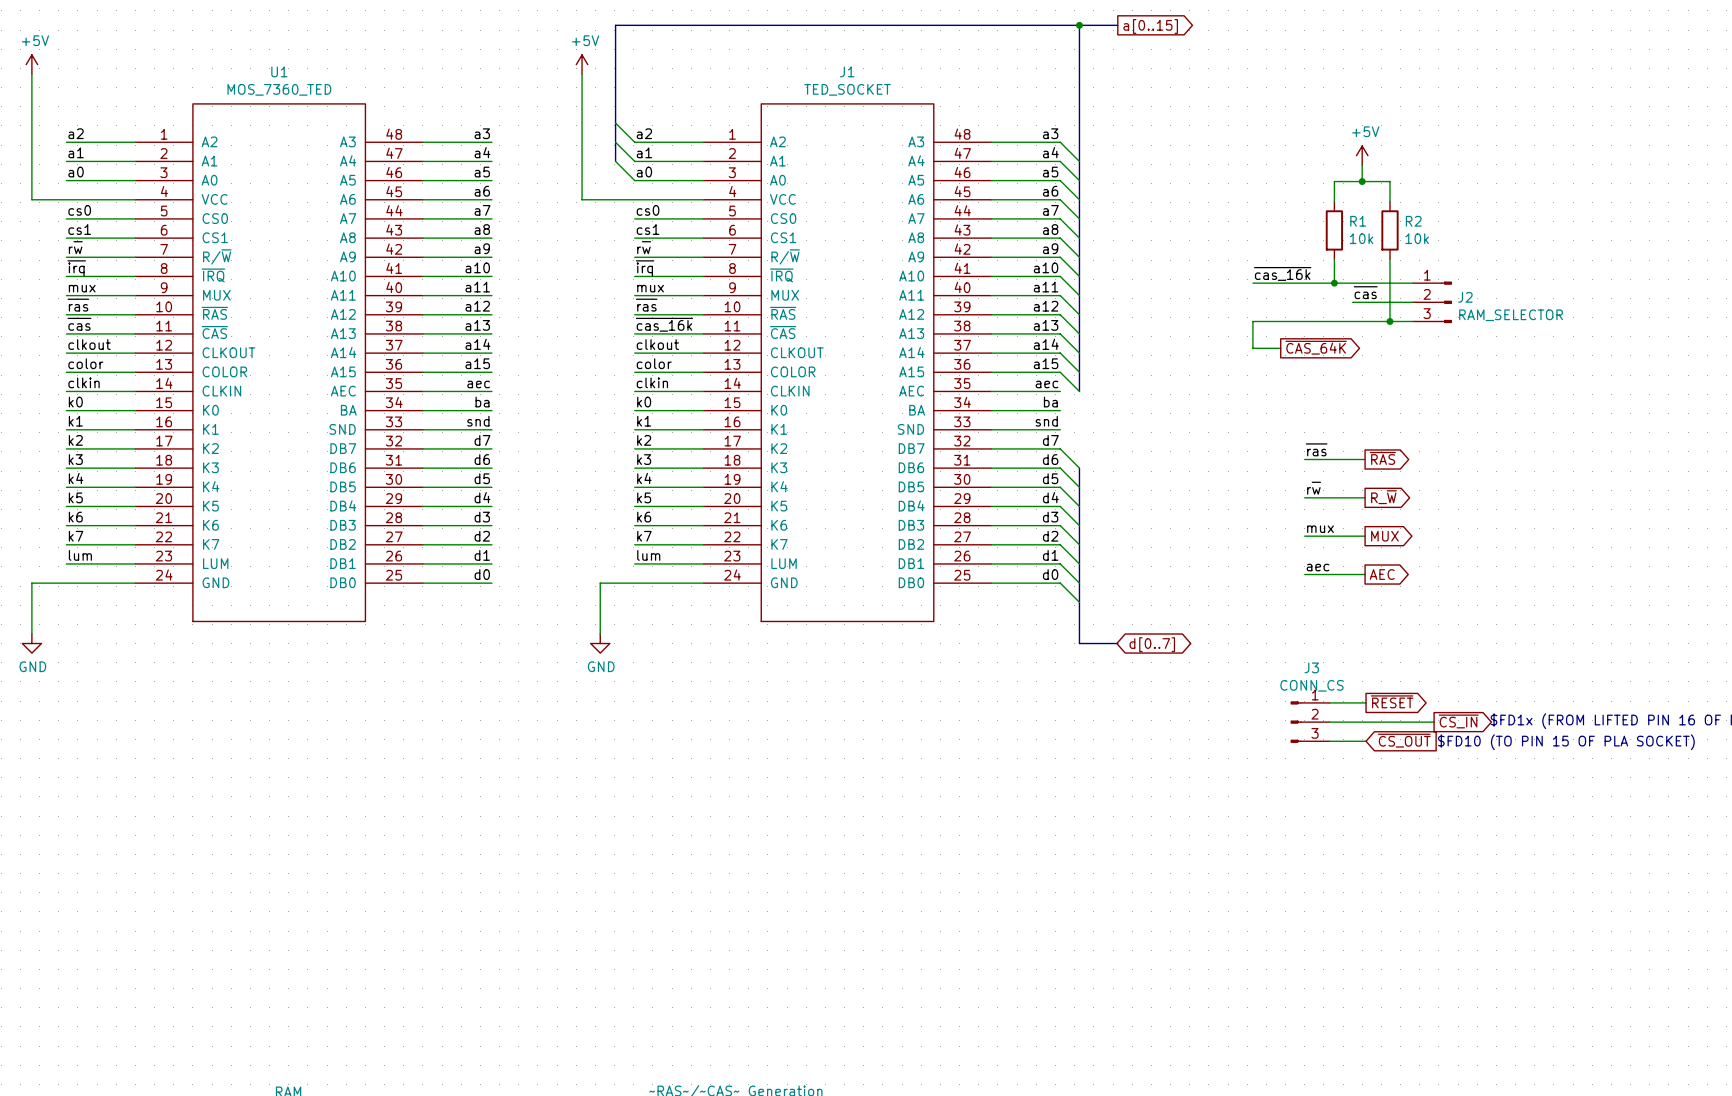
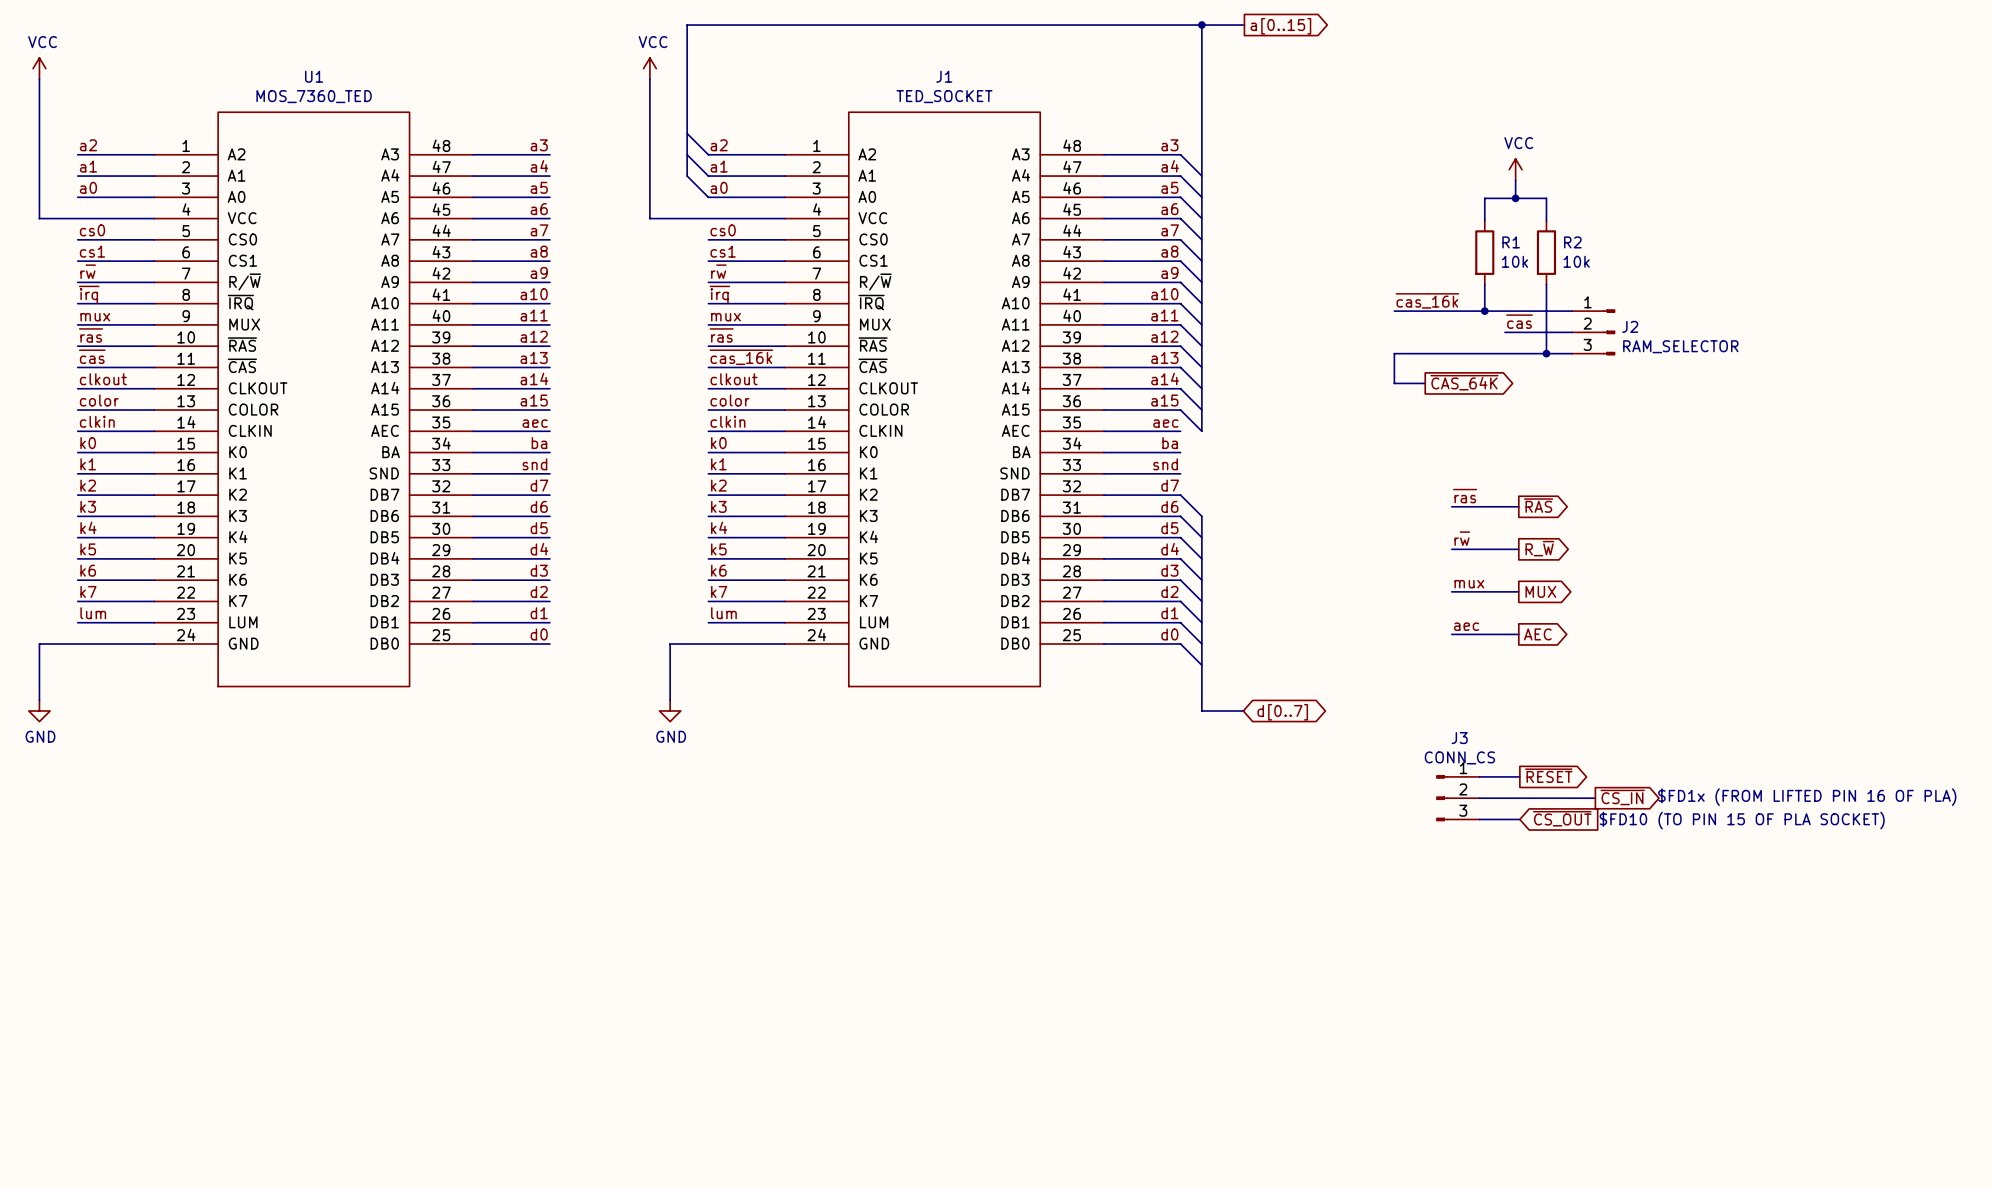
power symbol: +5V (31, 64) -> VCC (39, 68)
power symbol: +5V (582, 64) -> VCC (649, 68)
power symbol: +5V (1362, 155) -> VCC (1515, 169)

